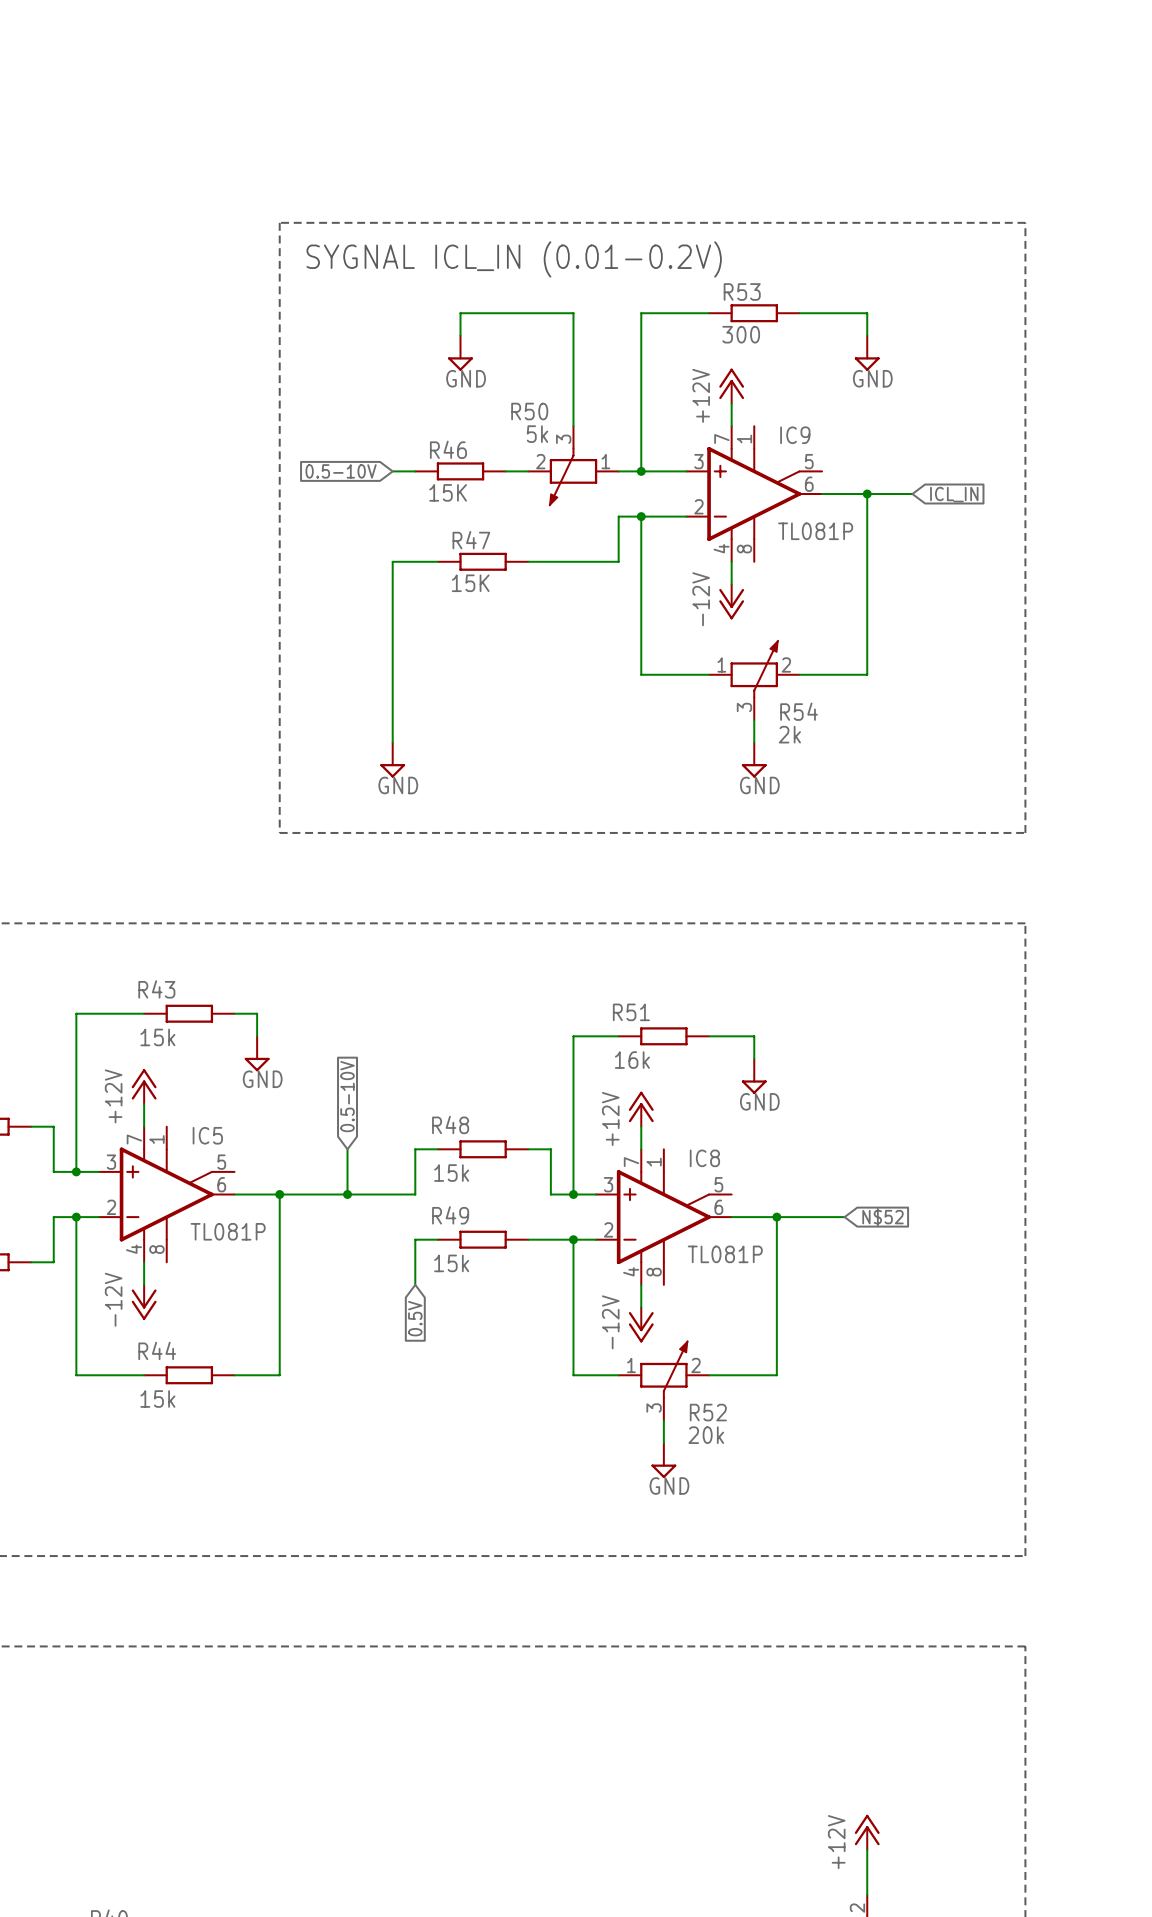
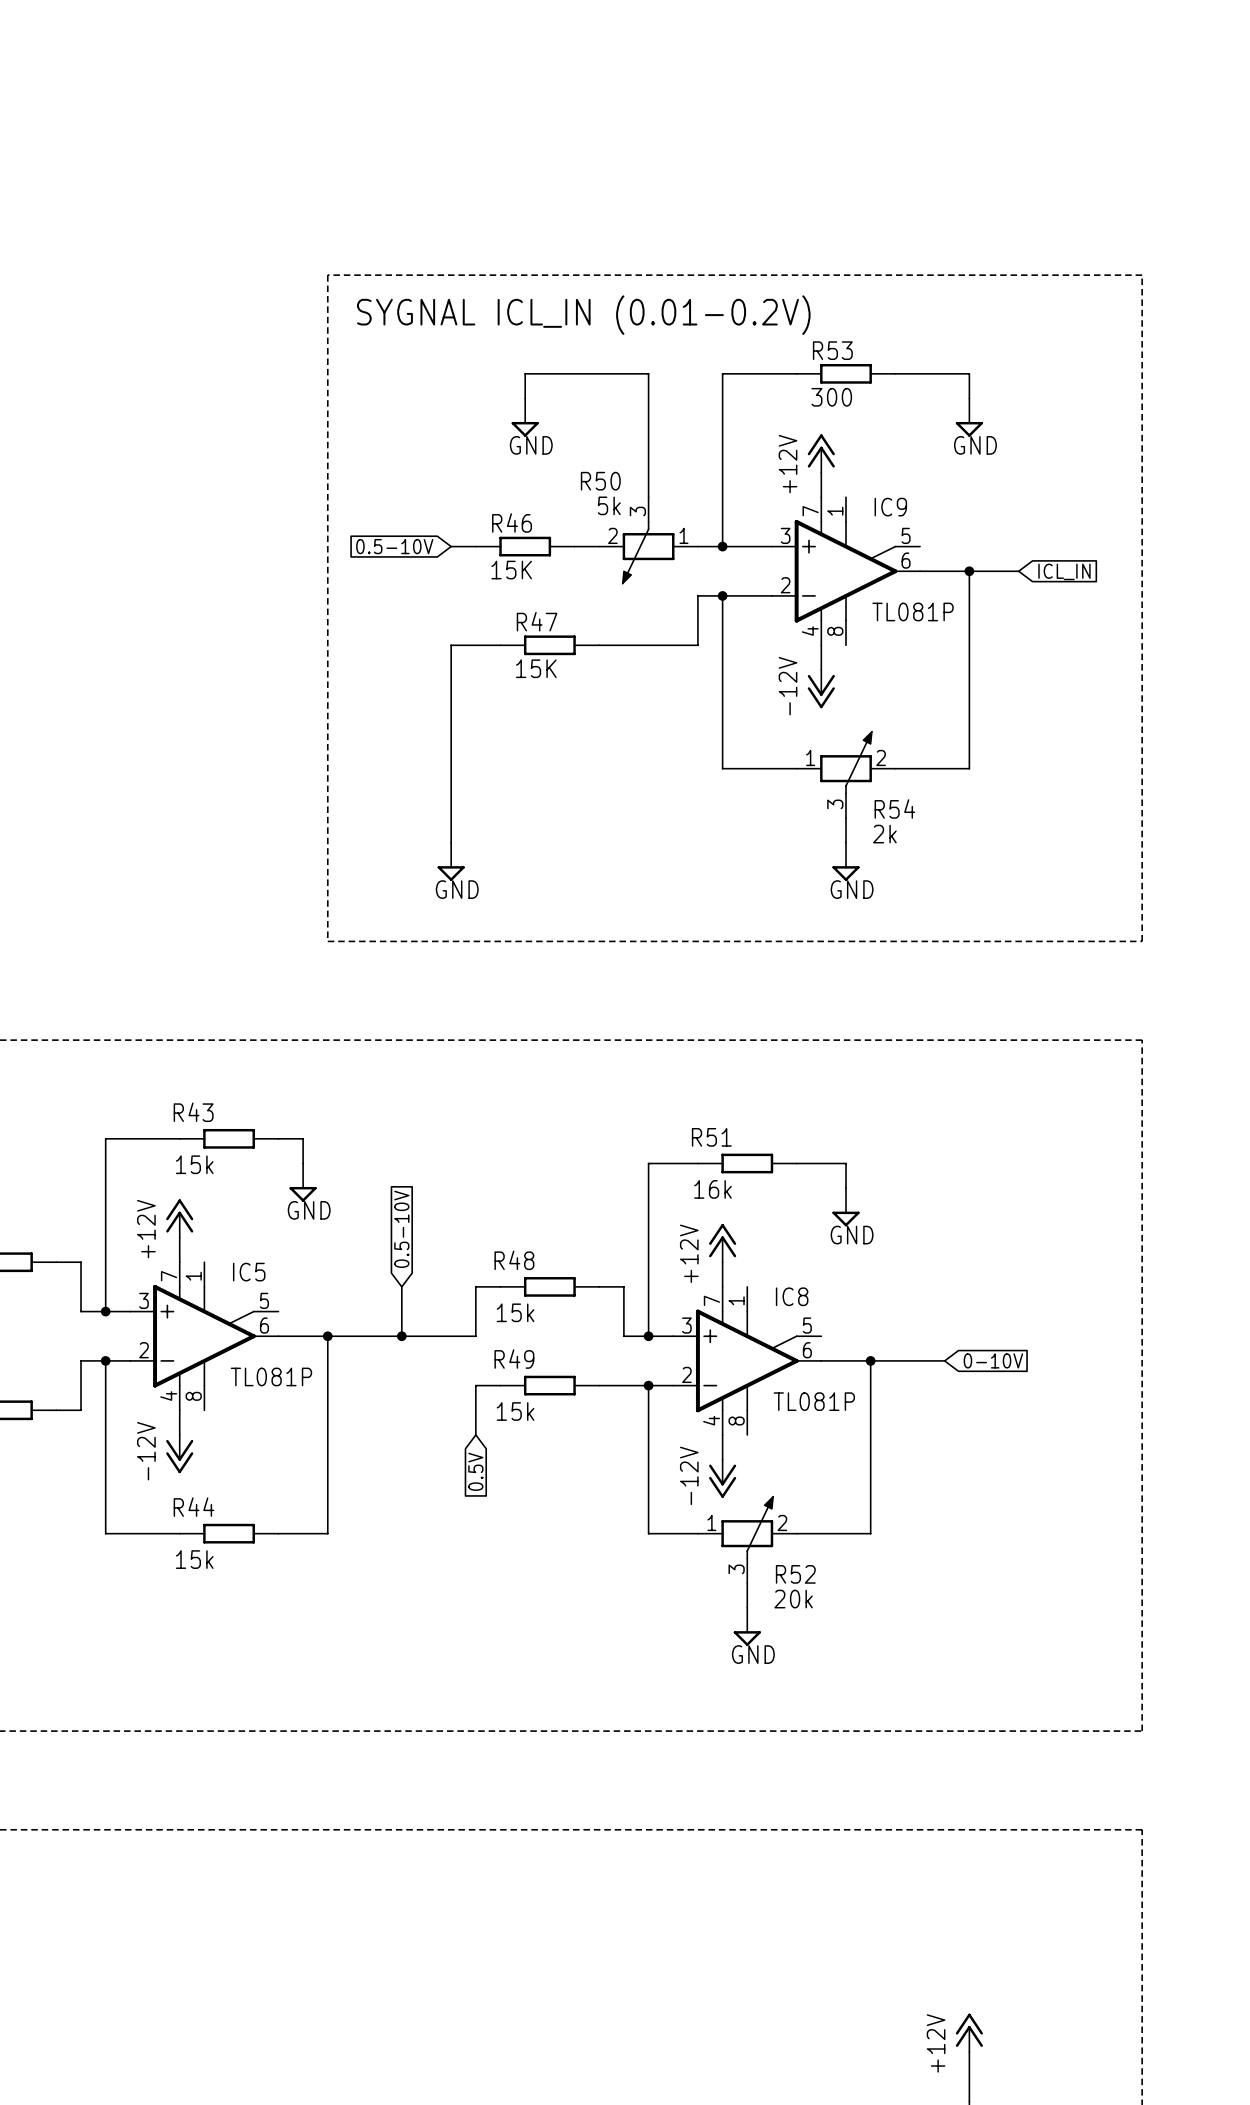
global label: N$52 (883, 1217) -> 0-10V (993, 1360)

